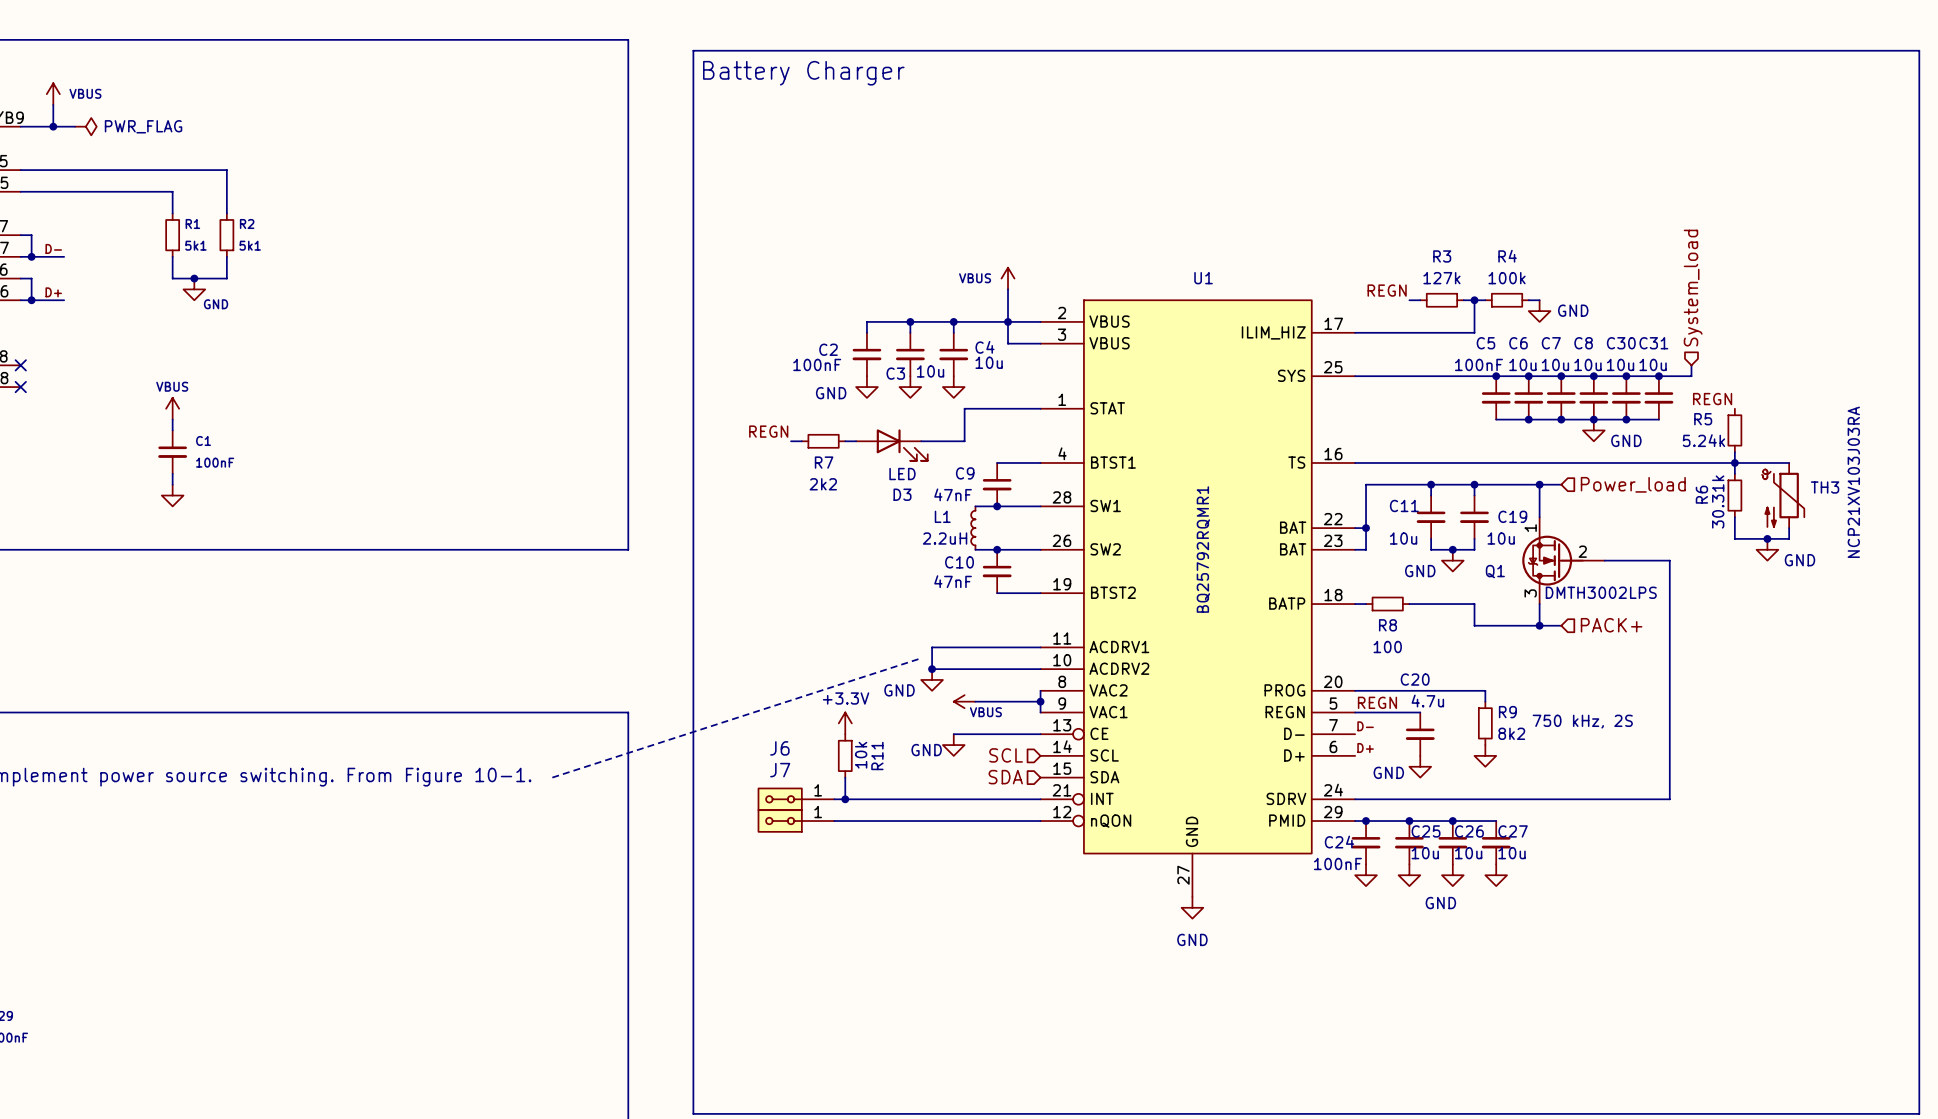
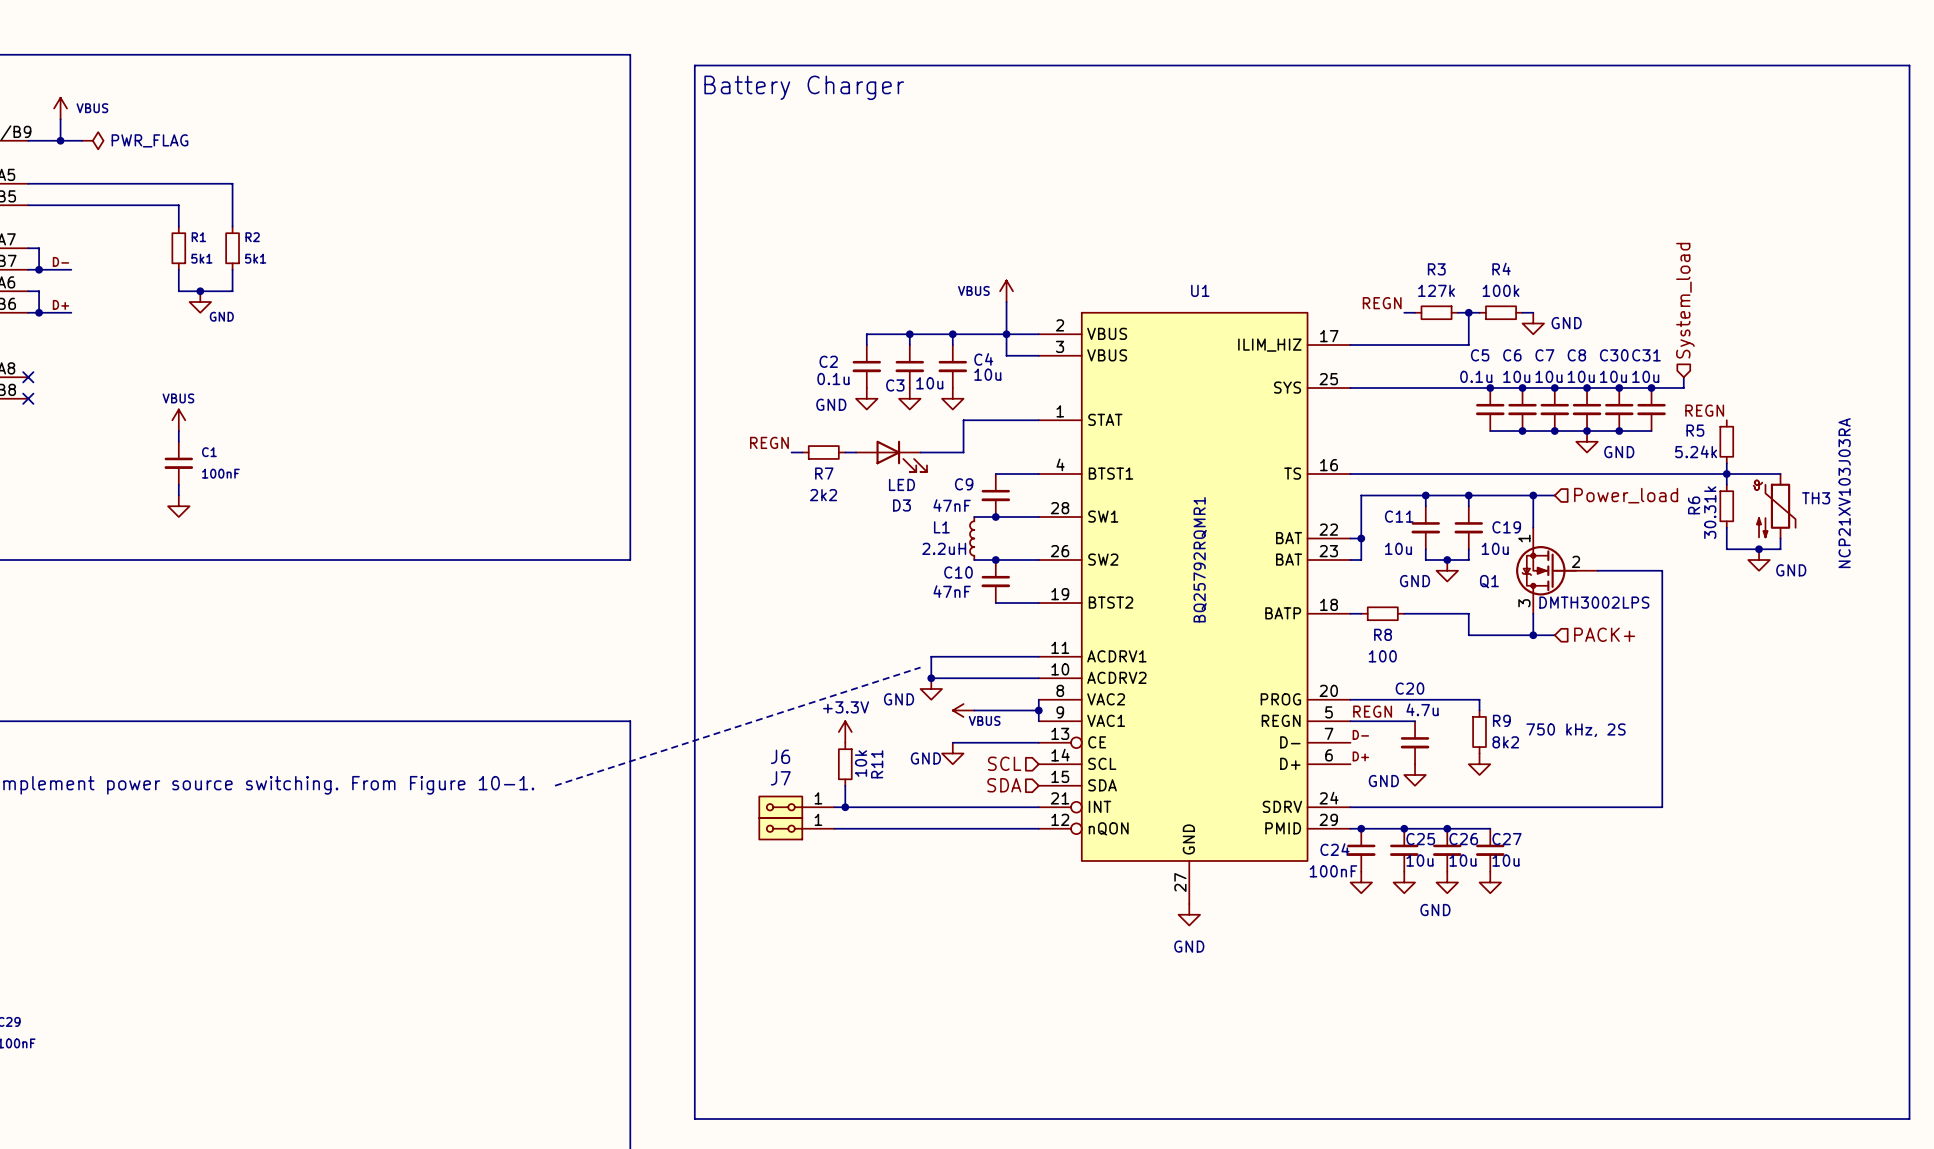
C2 value: 100nF (817, 364) -> 0.1u (833, 379)
C5 value: 100nF (1478, 364) -> 0.1u (1476, 376)

